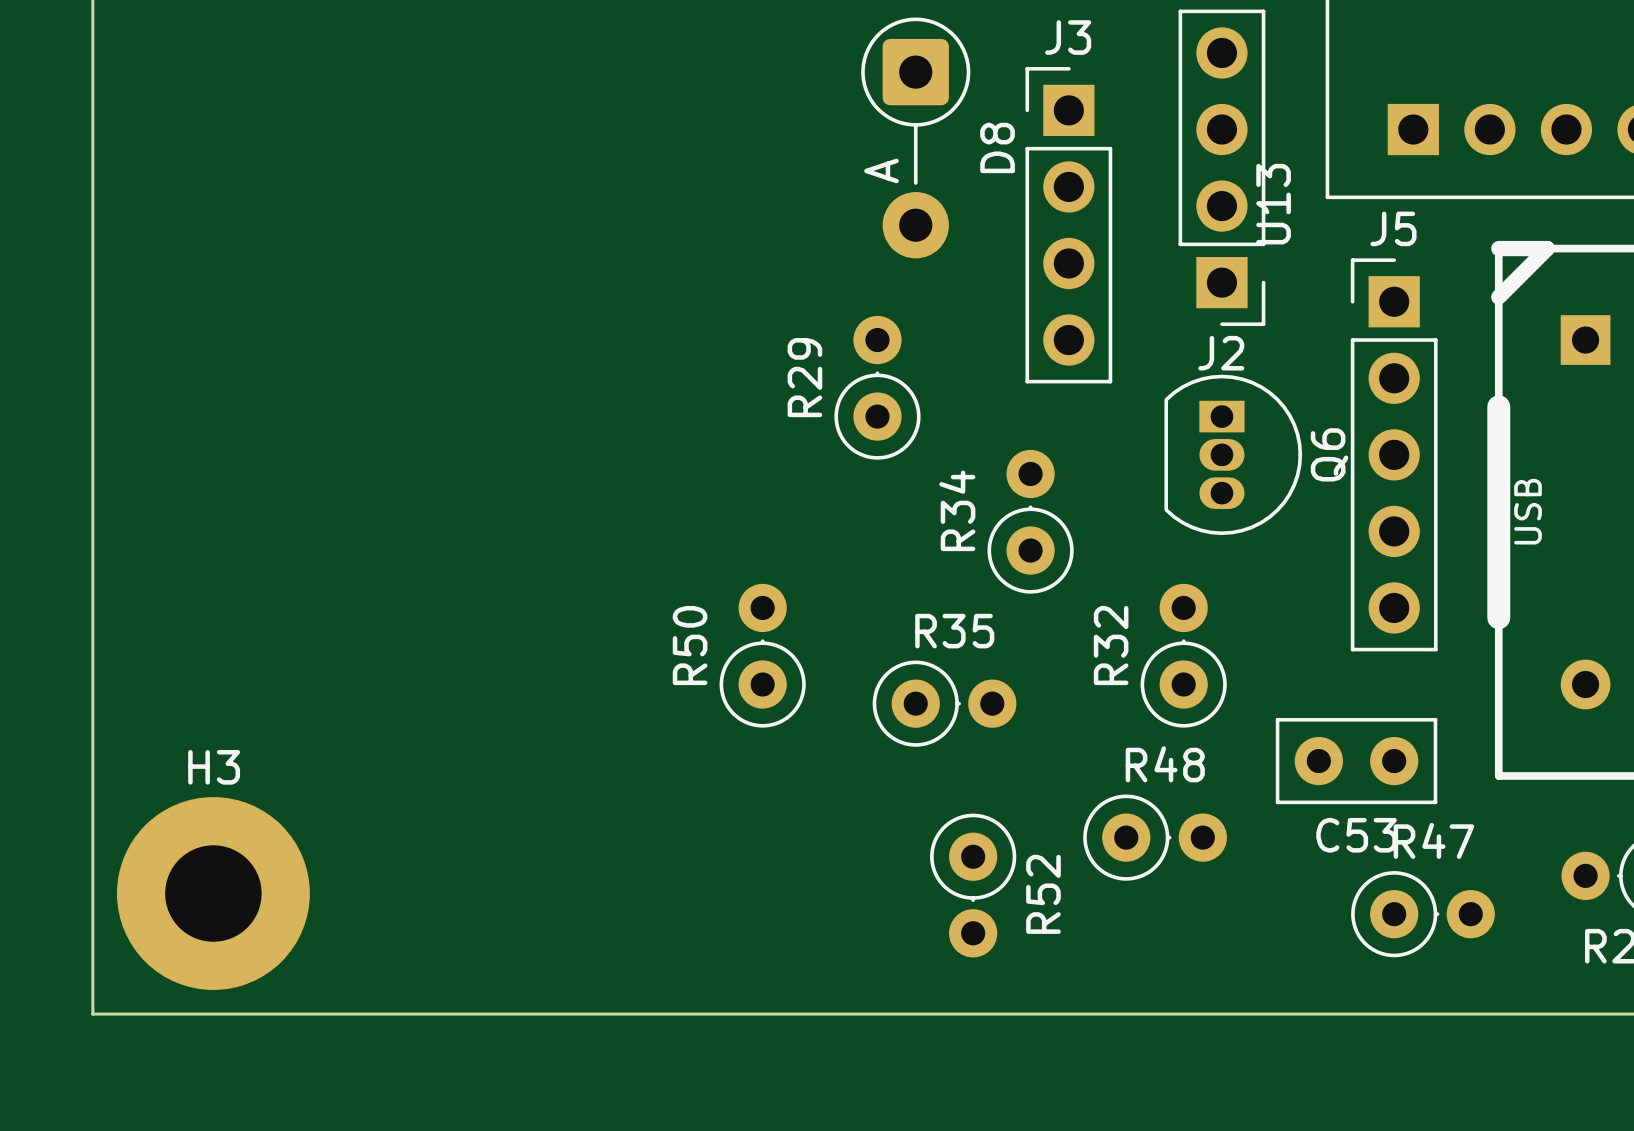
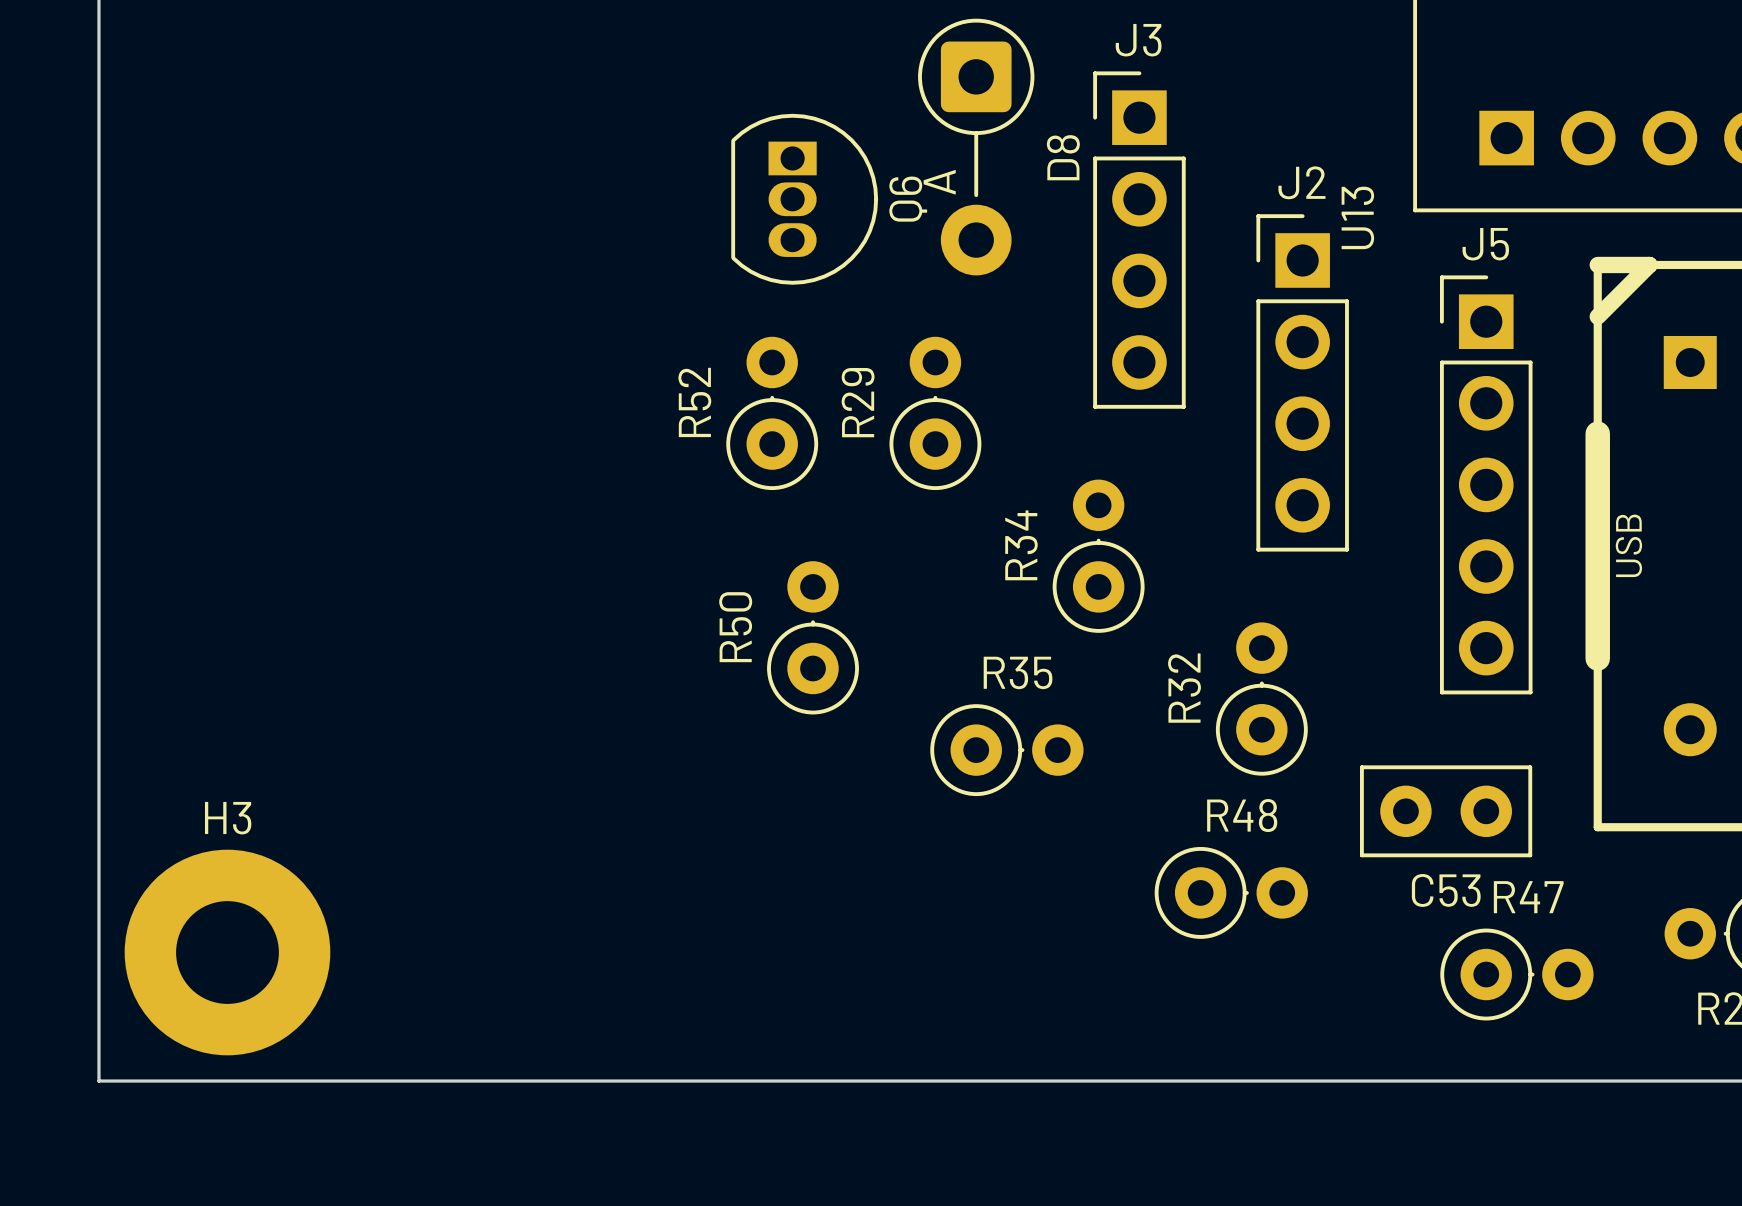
J2 rotation: 0° (1221, 167) -> 180° (1302, 382)
J2 position: (1221, 167) -> (1302, 382)
Q6 position: (1233, 454) -> (804, 199)
R50 position: (762, 655) -> (813, 637)
R52 rotation: 0° (973, 885) -> 180° (772, 413)
R52 position: (973, 885) -> (772, 413)

